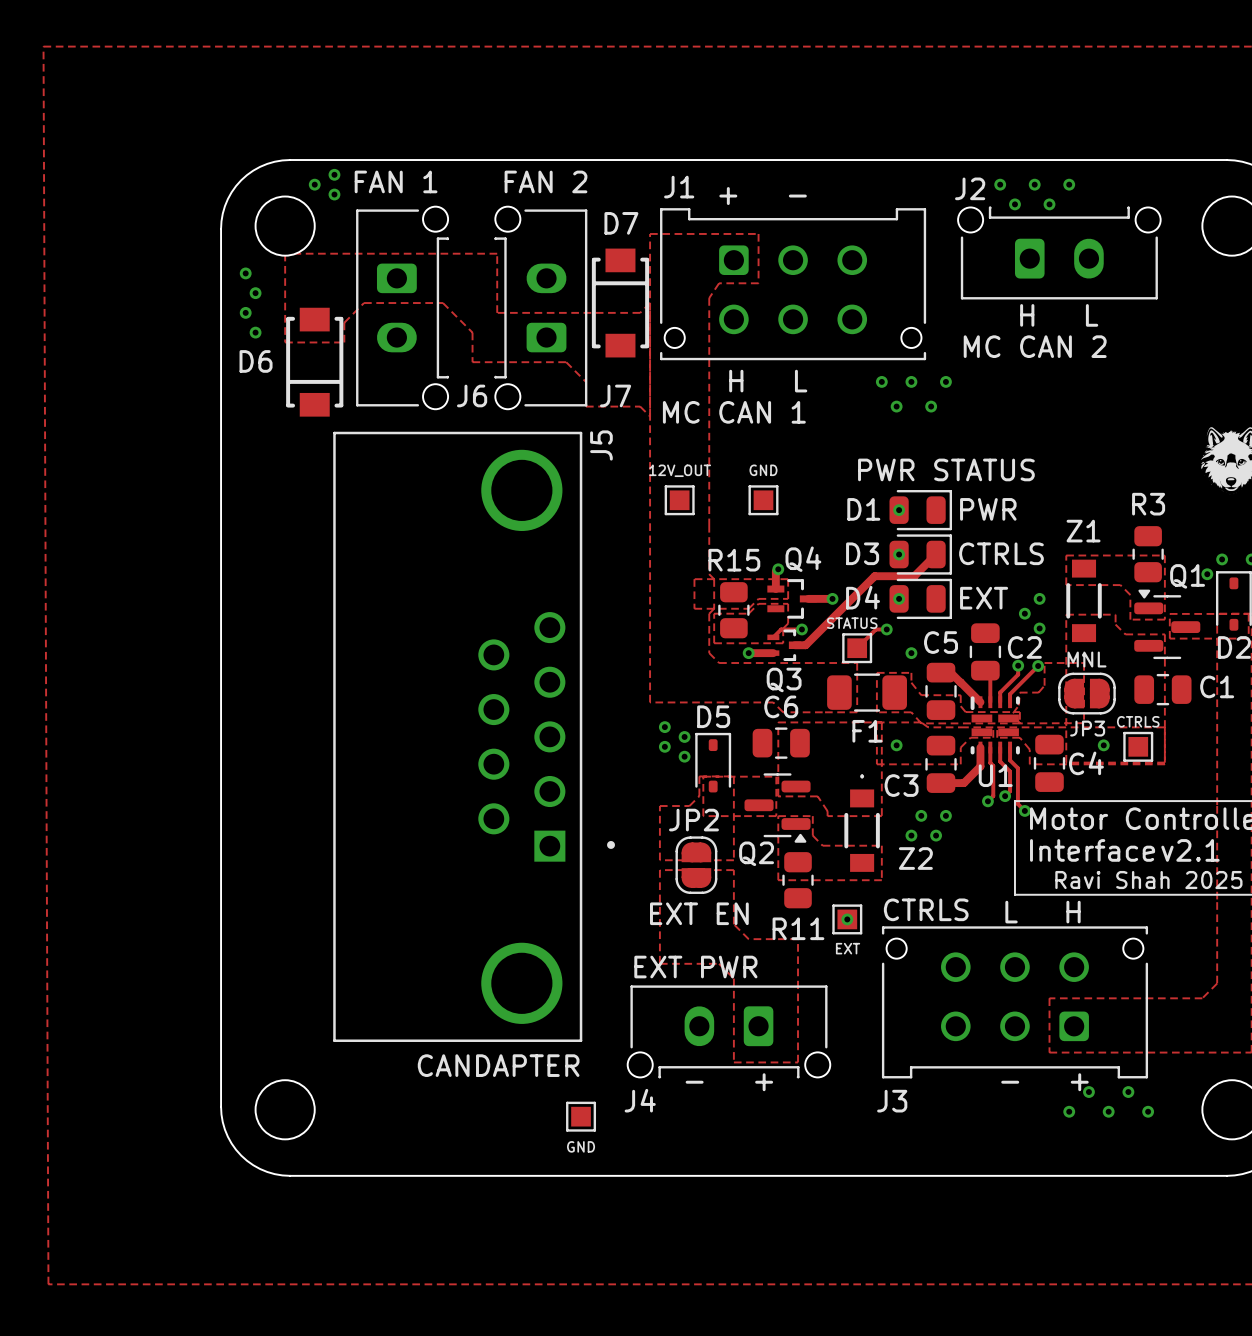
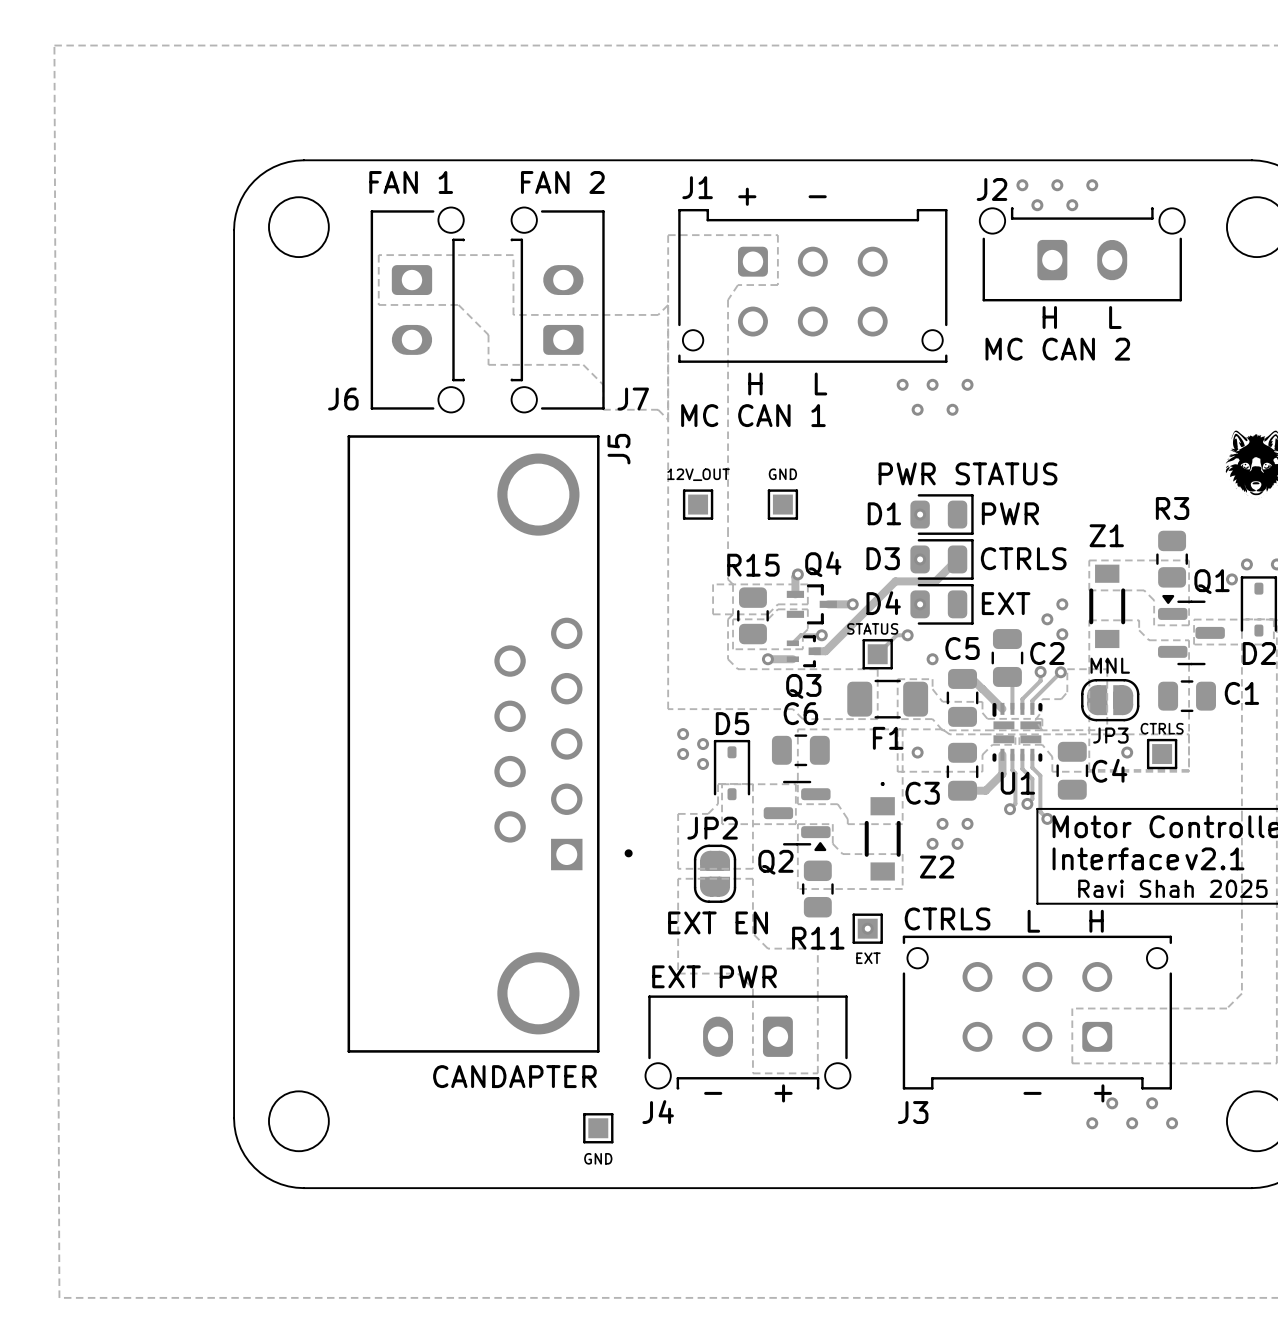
via: (334, 174) -> none
via: (314, 184) -> none
via: (334, 194) -> none
zone outline: (364, 253) (285, 253) (285, 342) (344, 342) (344, 322) (364, 303) -> (378, 255) (378, 304)
via: (245, 273) -> none
via: (255, 293) -> none
D7: (620, 303) -> none
via: (245, 312) -> none
via: (255, 332) -> none
D6: (314, 362) -> none
J6 name position: J6 (472, 395) -> J6 (343, 399)

